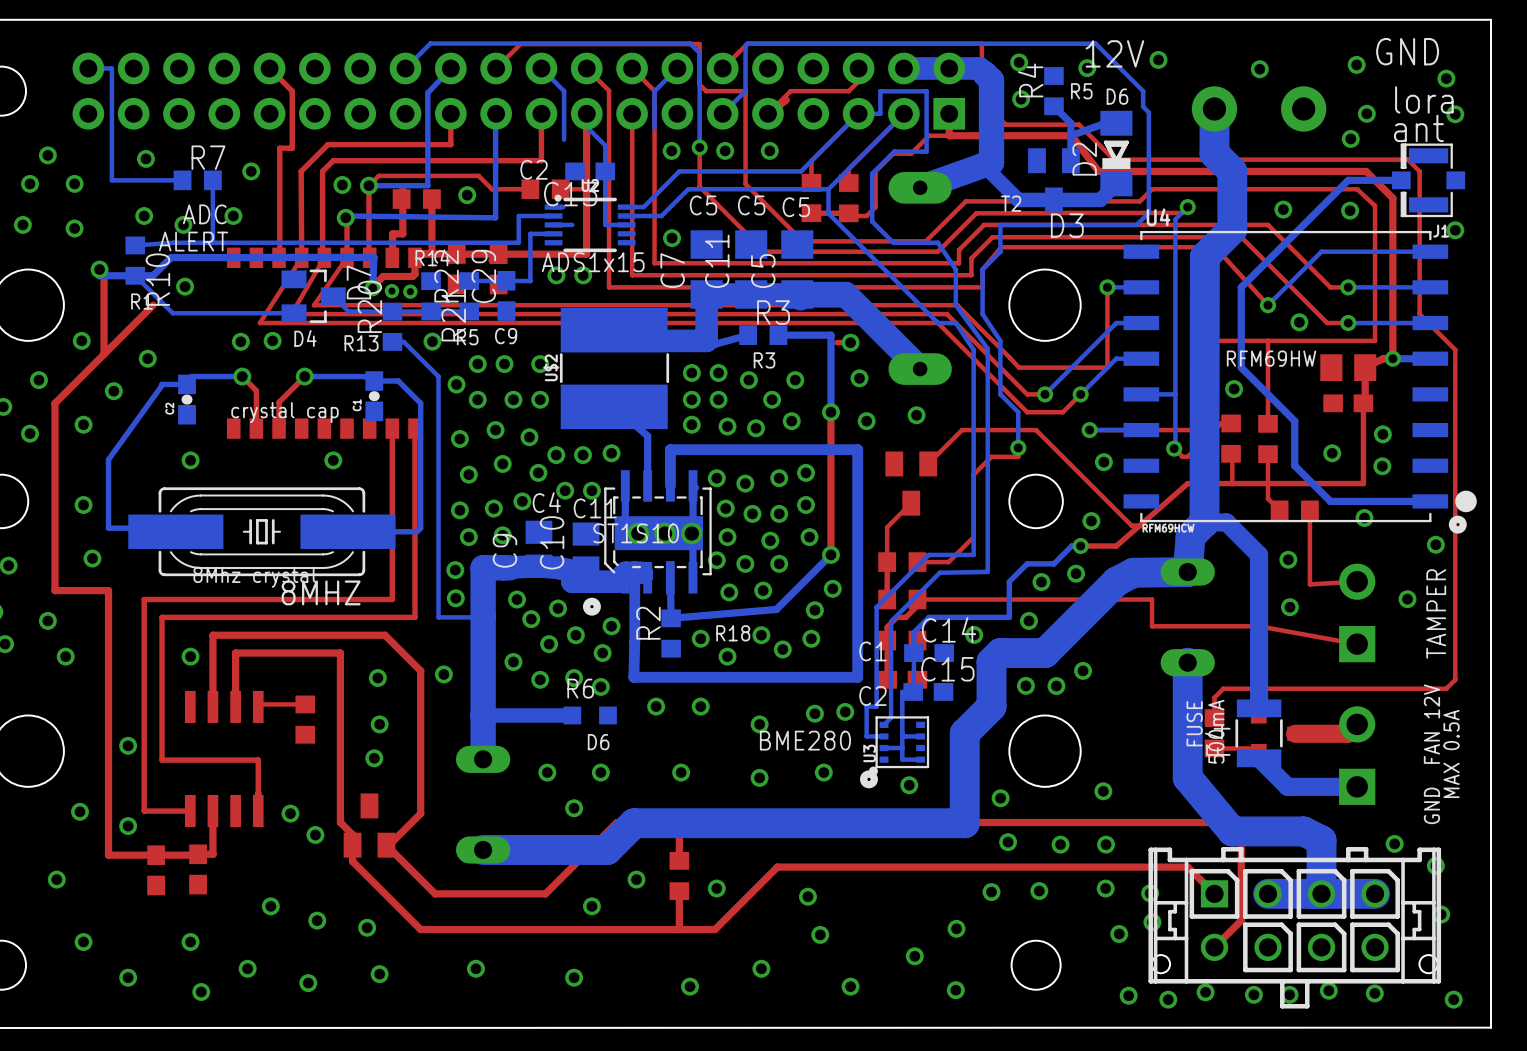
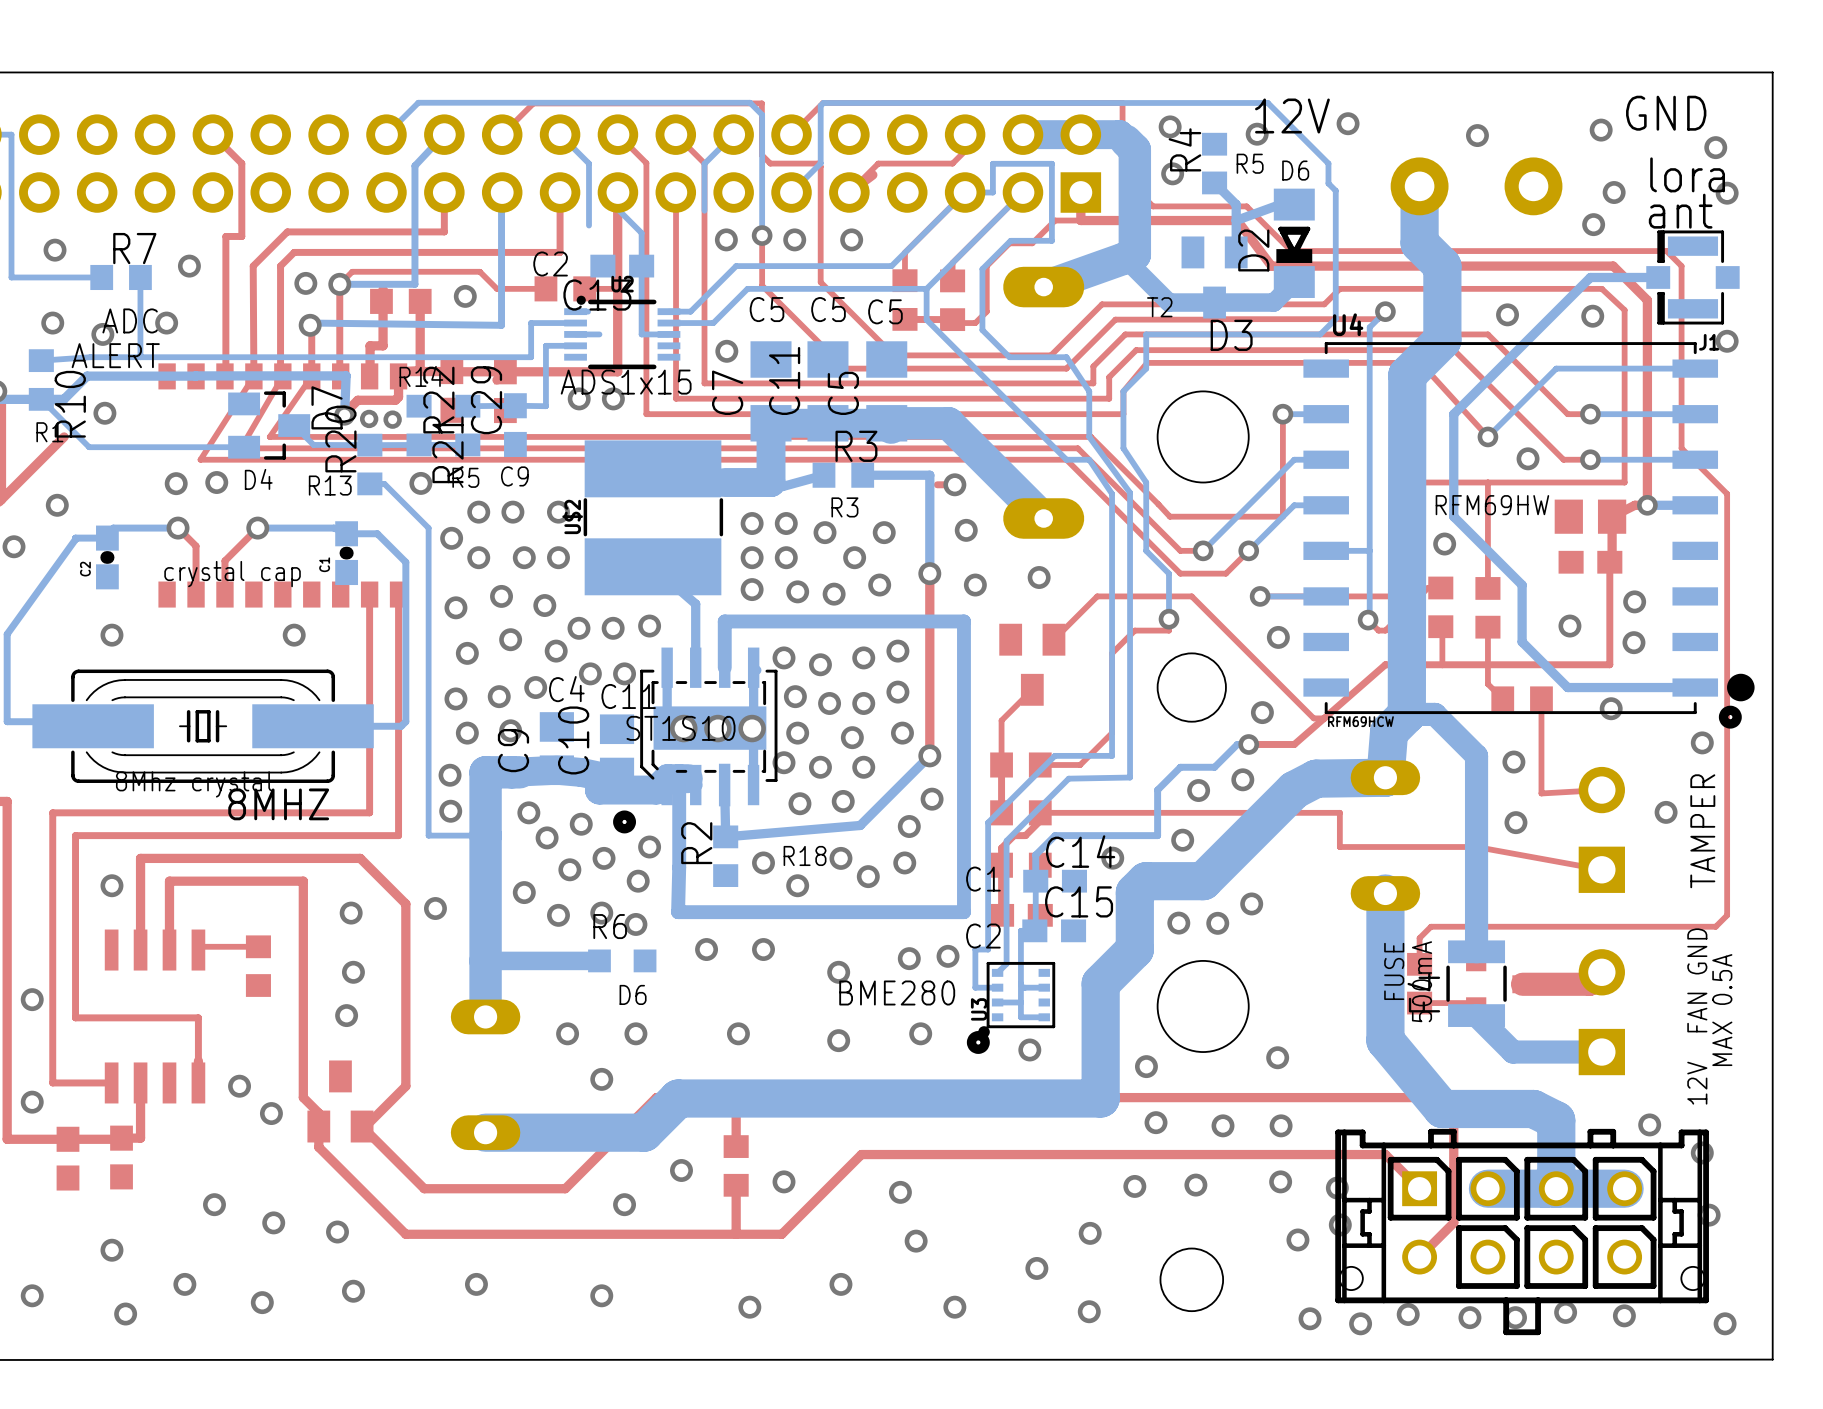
text: GND FAN 12V (1431, 754) -> 12V FAN GND (1697, 1016)

